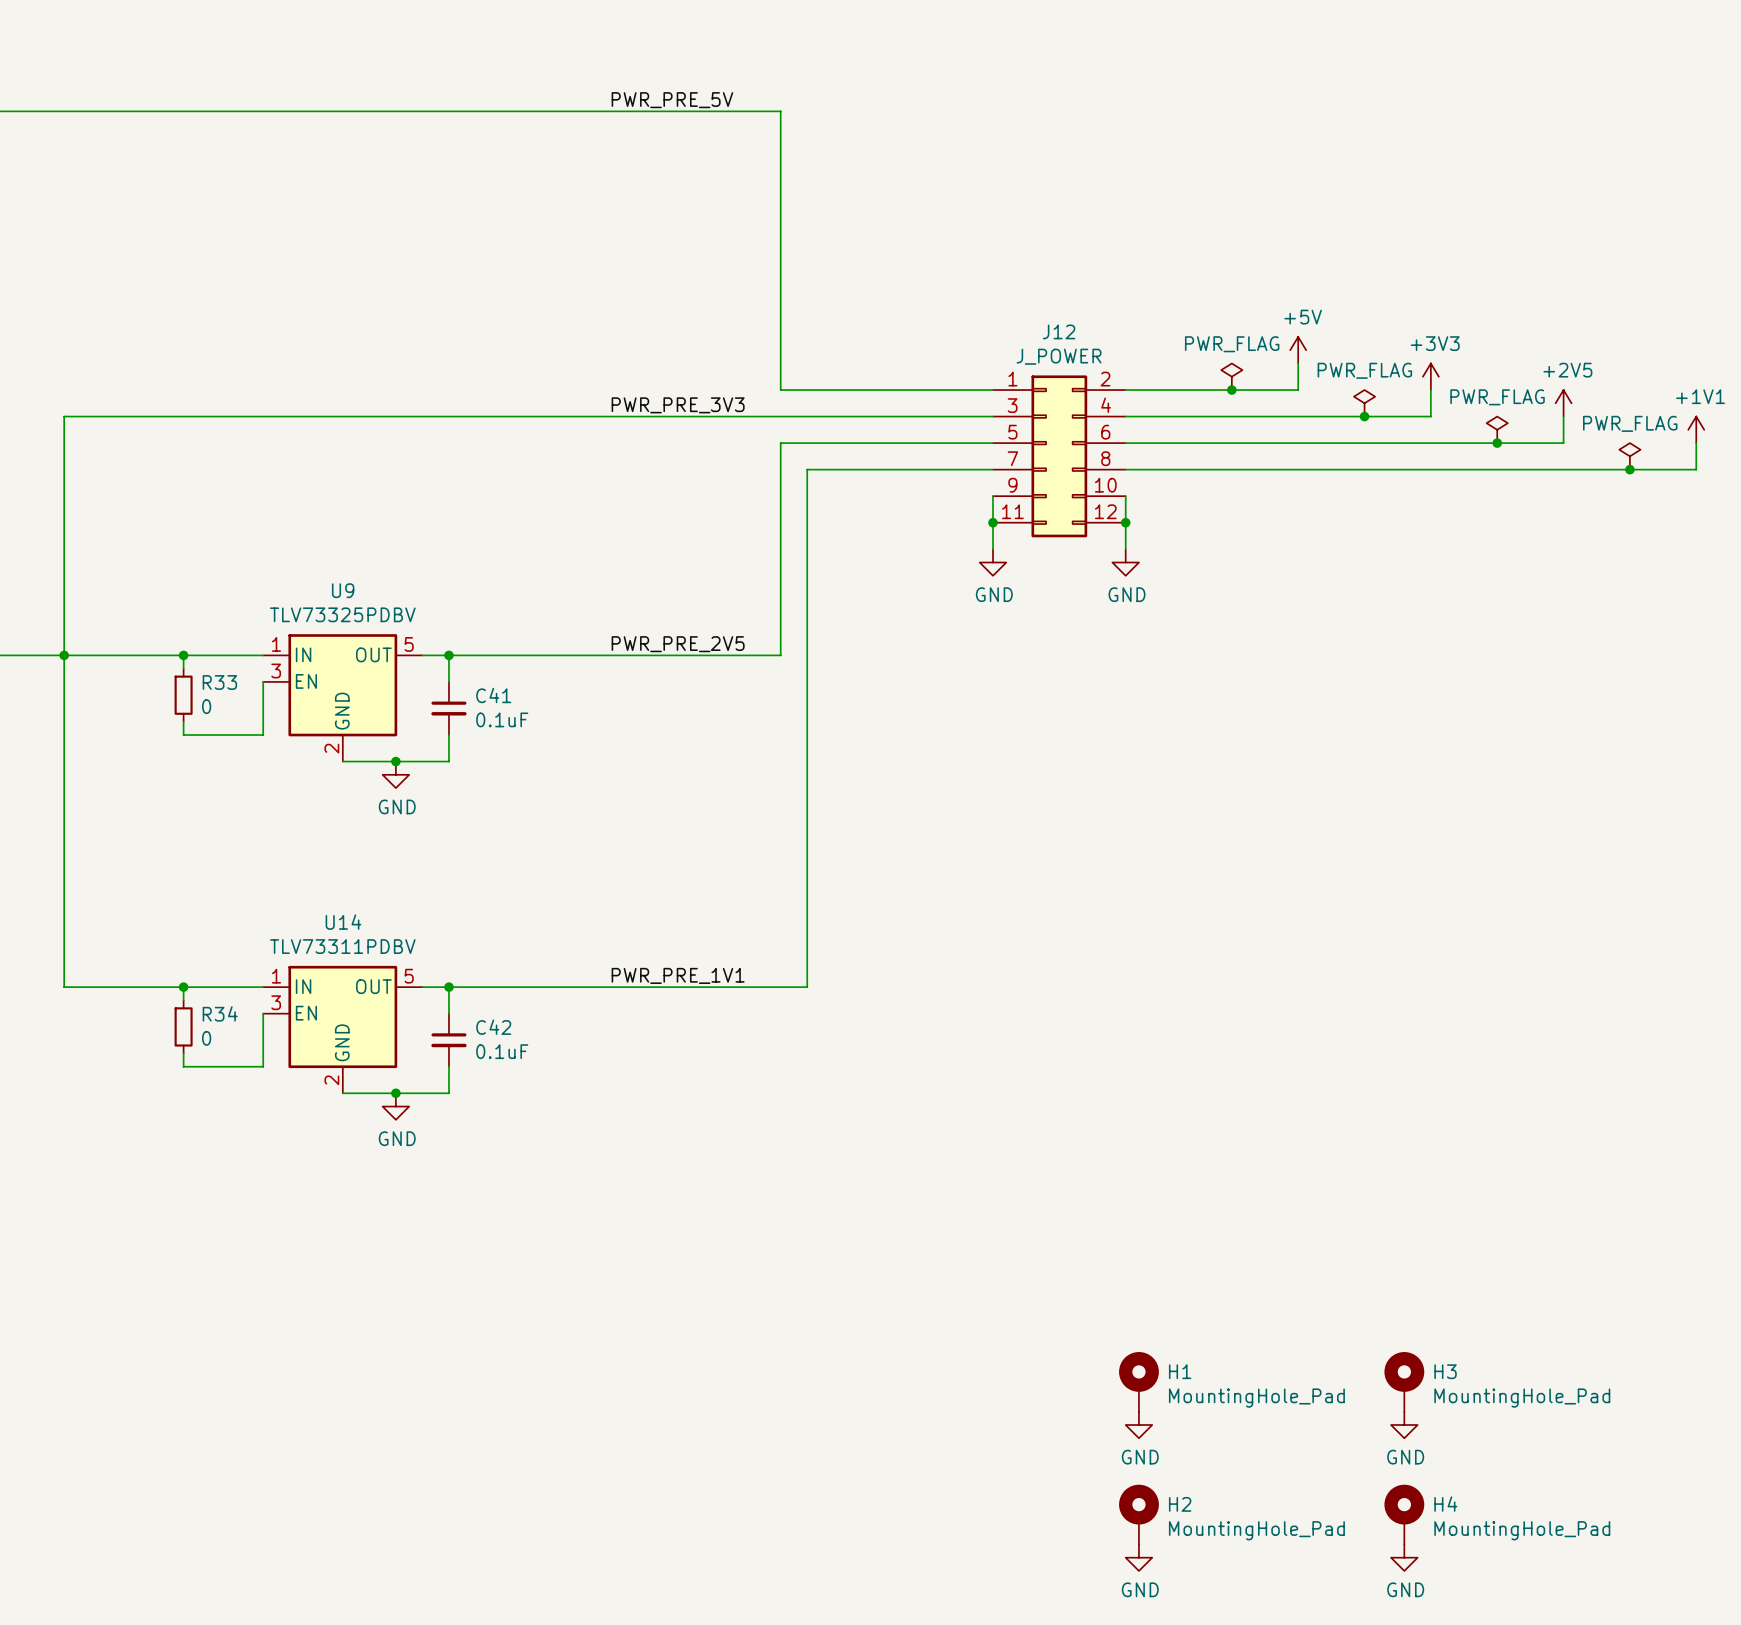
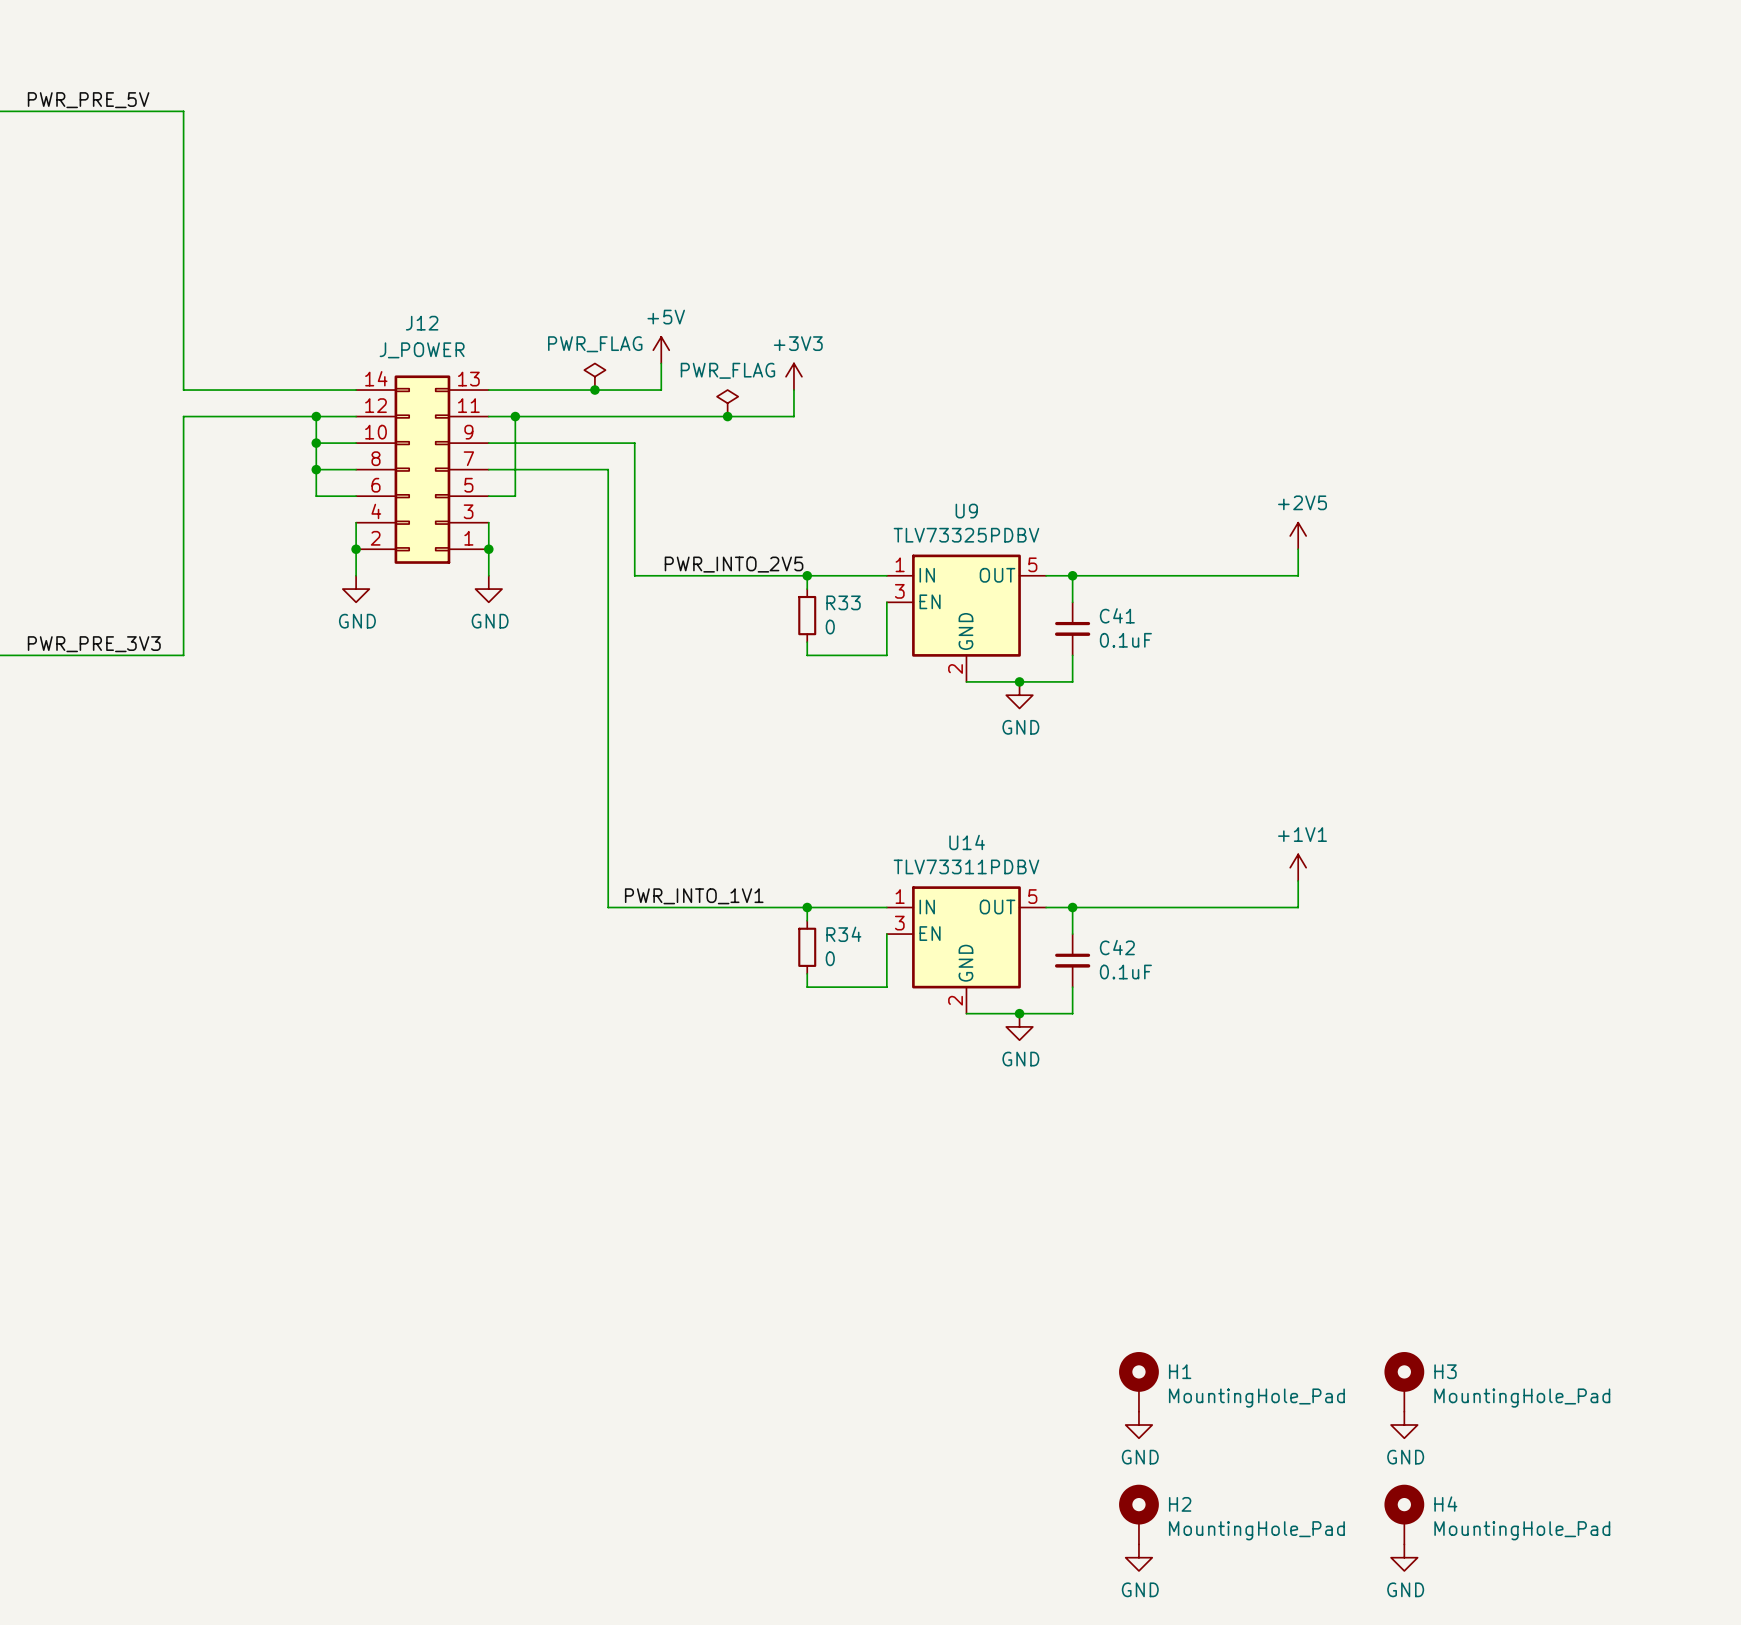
label: none -> PWR_PRE_5V (88, 100)
label: PWR_PRE_5V (672, 100) -> none
wire: (183, 111) (780, 111) (780, 390) (993, 390) -> (183, 111) (183, 390) (356, 390)
J12 name position: J12 (1059, 331) -> J12 (422, 323)
power symbol: none -> +5V (661, 350)
power symbol: +5V (1298, 350) -> none
wire: none -> (661, 363) (661, 390) (488, 390)
wire: (1298, 363) (1298, 390) (1125, 390) -> none
J12 symbol: [993, 375, 1126, 538] -> [356, 375, 489, 564]
power symbol: none -> PWR_FLAG (594, 376)
power symbol: none -> +3V3 (793, 376)
power symbol: PWR_FLAG (1231, 376) -> none
power symbol: +3V3 (1430, 376) -> none
junction: none -> (594, 390)
junction: (1231, 390) -> none
wire: (1430, 390) (1430, 416) (1125, 416) -> none
power symbol: none -> PWR_FLAG (727, 403)
power symbol: PWR_FLAG (1364, 403) -> none
power symbol: +2V5 (1563, 403) -> none
label: PWR_PRE_3V3 (678, 405) -> none
wire: (183, 416) (64, 416) (64, 987) (263, 987) -> (183, 416) (183, 655)
wire: none -> (316, 416) (316, 496) (356, 496)
junction: none -> (316, 416)
wire: none -> (515, 416) (515, 496) (488, 496)
junction: none -> (515, 416)
junction: none -> (727, 416)
wire: (793, 416) (993, 416) -> (793, 416) (793, 390)
junction: (1364, 416) -> none
wire: (1563, 416) (1563, 443) (1125, 443) -> none
power symbol: PWR_FLAG (1497, 429) -> none
power symbol: +1V1 (1696, 429) -> none
wire: none -> (316, 443) (356, 443)
junction: none -> (316, 443)
wire: none -> (488, 443) (634, 443) (634, 575) (886, 575)
wire: (993, 443) (780, 443) (780, 655) (422, 655) -> none
junction: (1497, 443) -> none
wire: (1696, 443) (1696, 469) (1125, 469) -> none
power symbol: PWR_FLAG (1629, 456) -> none
wire: none -> (316, 469) (356, 469)
junction: none -> (316, 469)
wire: none -> (488, 469) (608, 469) (608, 907) (886, 907)
wire: (993, 469) (807, 469) (807, 575) -> none
junction: (1629, 469) -> none
wire: (993, 496) (993, 549) -> none
wire: (1125, 496) (1125, 549) -> none
wire: none -> (356, 522) (356, 575)
wire: none -> (488, 522) (488, 575)
junction: (993, 522) -> none
junction: (1125, 522) -> none
power symbol: none -> +2V5 (1298, 535)
junction: none -> (356, 549)
junction: none -> (488, 549)
wire: none -> (1298, 549) (1298, 575) (1046, 575)
power symbol: GND (993, 562) -> none
power symbol: GND (1125, 562) -> none
label: none -> PWR_INTO_2V5 (734, 564)
junction: none -> (807, 575)
wire: none -> (1072, 575) (1072, 602)
junction: none -> (1072, 575)
power symbol: none -> GND (356, 589)
power symbol: none -> GND (488, 589)
wire: (807, 589) (807, 642) -> none
label: none -> PWR_PRE_3V3 (94, 644)
label: PWR_PRE_2V5 (678, 644) -> none
junction: (64, 655) -> none
junction: (183, 655) -> none
wire: (263, 655) (183, 655) (183, 668) -> none
wire: (448, 655) (448, 681) -> none
junction: (448, 655) -> none
wire: (807, 655) (807, 907) -> (807, 655) (886, 655) (886, 602)
wire: none -> (1072, 655) (1072, 681) (966, 681)
wire: (263, 681) (263, 735) (183, 735) (183, 721) -> none
junction: none -> (1019, 681)
R33 position: (183, 695) -> (807, 615)
power symbol: none -> GND (1019, 695)
U9 position: (342, 697) -> (966, 618)
C41 position: (448, 708) -> (1072, 628)
wire: (448, 735) (448, 761) (342, 761) -> none
junction: (395, 761) -> none
power symbol: GND (395, 774) -> none
power symbol: none -> +1V1 (1298, 867)
wire: none -> (1298, 880) (1298, 907) (1046, 907)
label: none -> PWR_INTO_1V1 (694, 896)
junction: none -> (807, 907)
wire: none -> (1072, 907) (1072, 934)
junction: none -> (1072, 907)
wire: (807, 920) (807, 973) -> none
label: PWR_PRE_1V1 (678, 975) -> none
wire: (183, 987) (183, 1000) -> none
junction: (183, 987) -> none
wire: (422, 987) (807, 987) -> (886, 934) (886, 987) (807, 987)
wire: (448, 987) (448, 1013) -> none
junction: (448, 987) -> none
wire: none -> (1072, 987) (1072, 1013) (966, 1013)
wire: (263, 1013) (263, 1066) (183, 1066) (183, 1053) -> none
junction: none -> (1019, 1013)
R34 position: (183, 1026) -> (807, 947)
power symbol: none -> GND (1019, 1026)
U14 position: (342, 1029) -> (966, 949)
C42 position: (448, 1040) -> (1072, 960)
wire: (448, 1066) (448, 1093) (342, 1093) -> none
junction: (395, 1093) -> none
power symbol: GND (395, 1106) -> none

